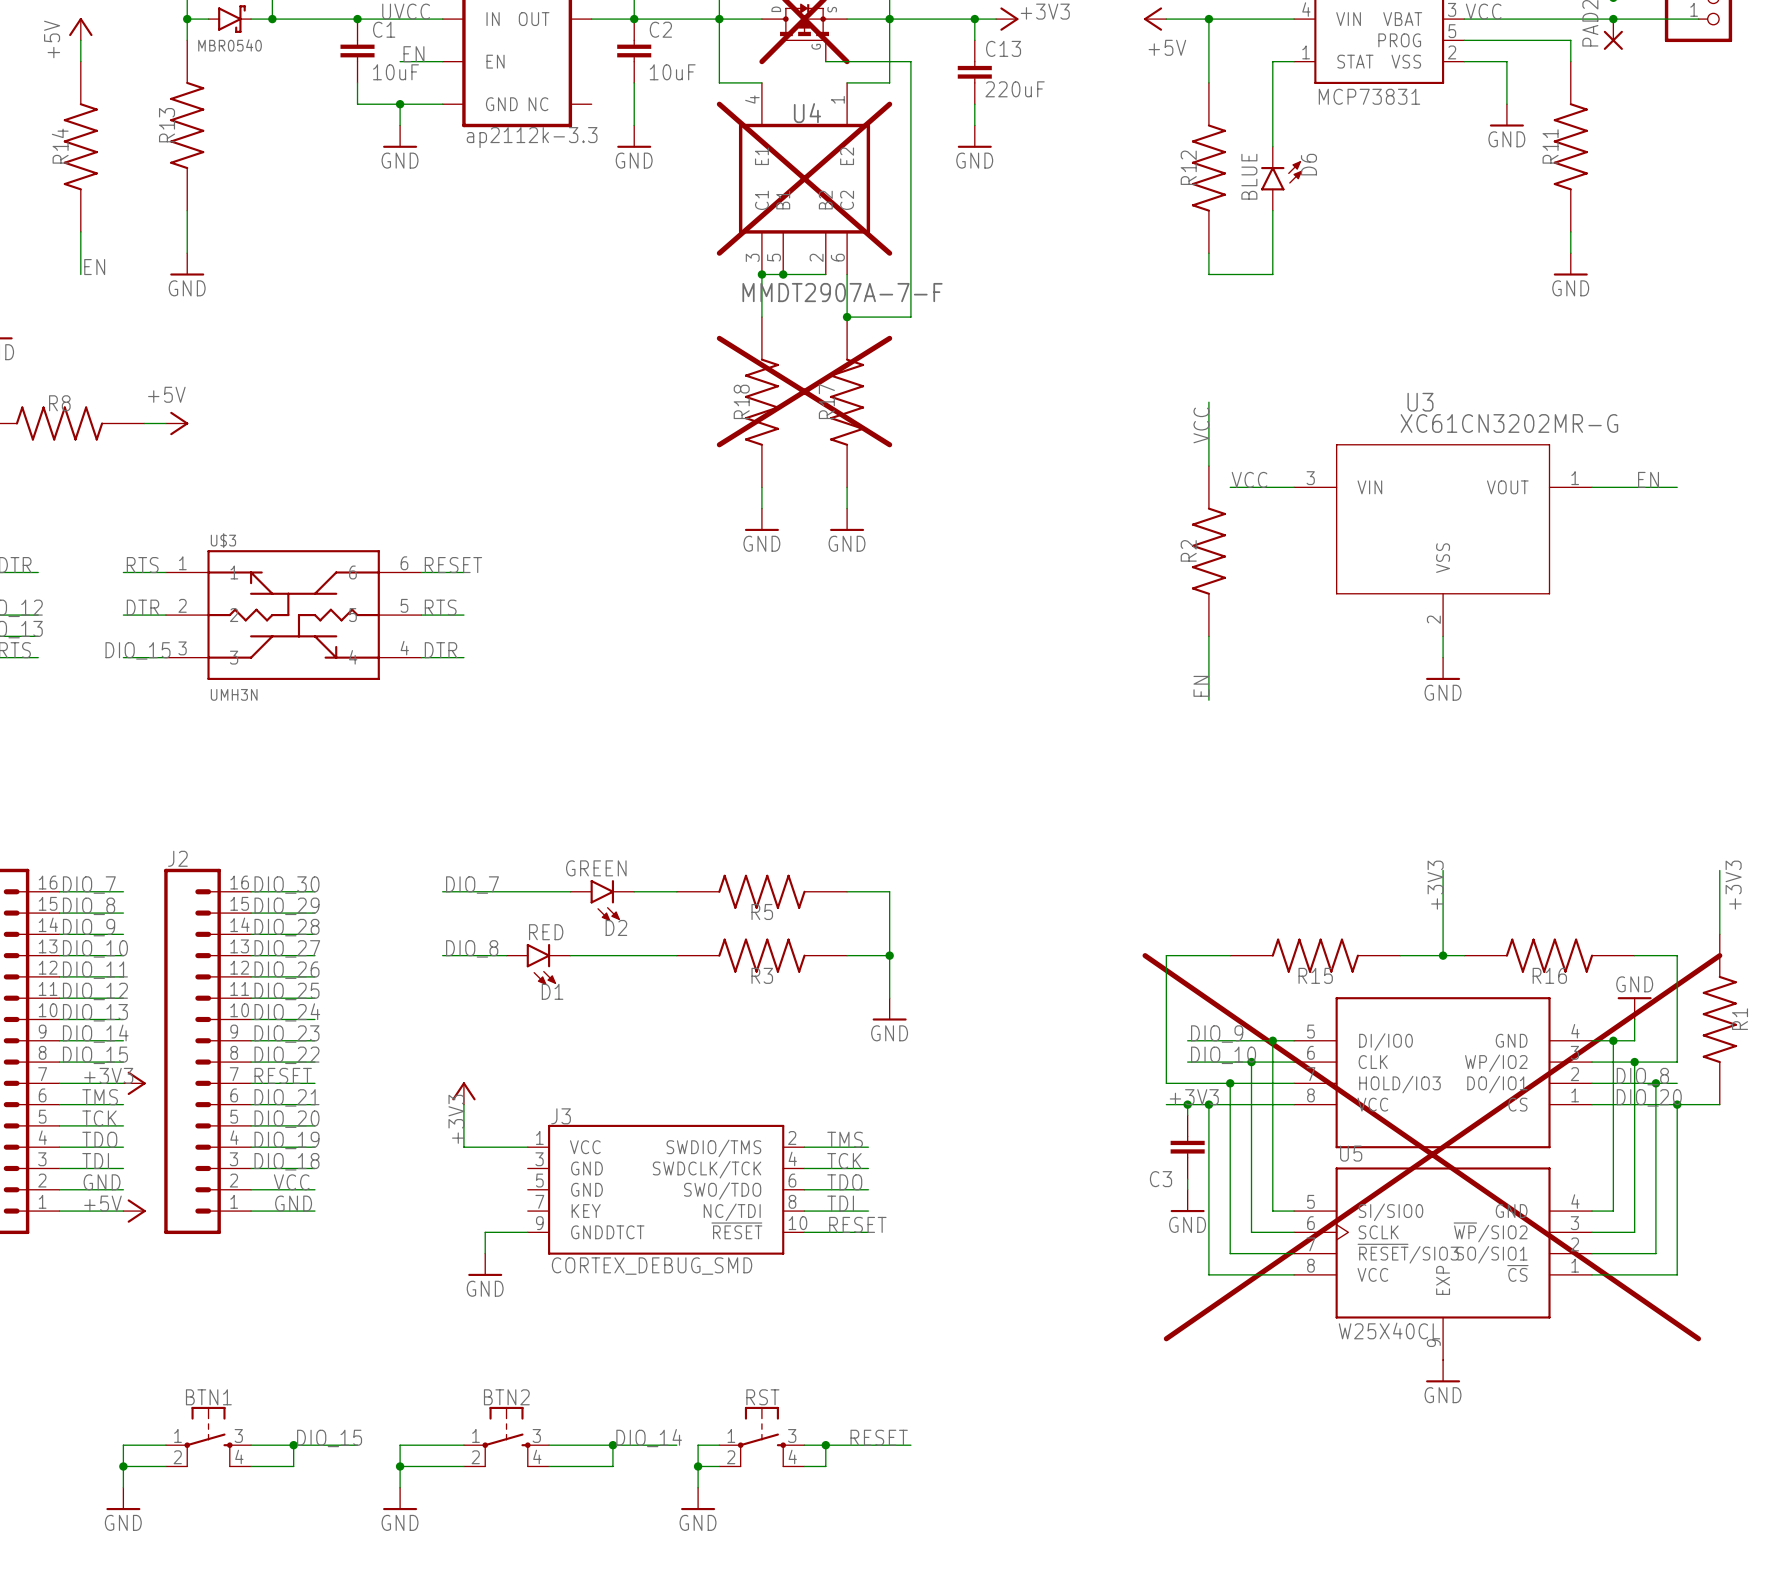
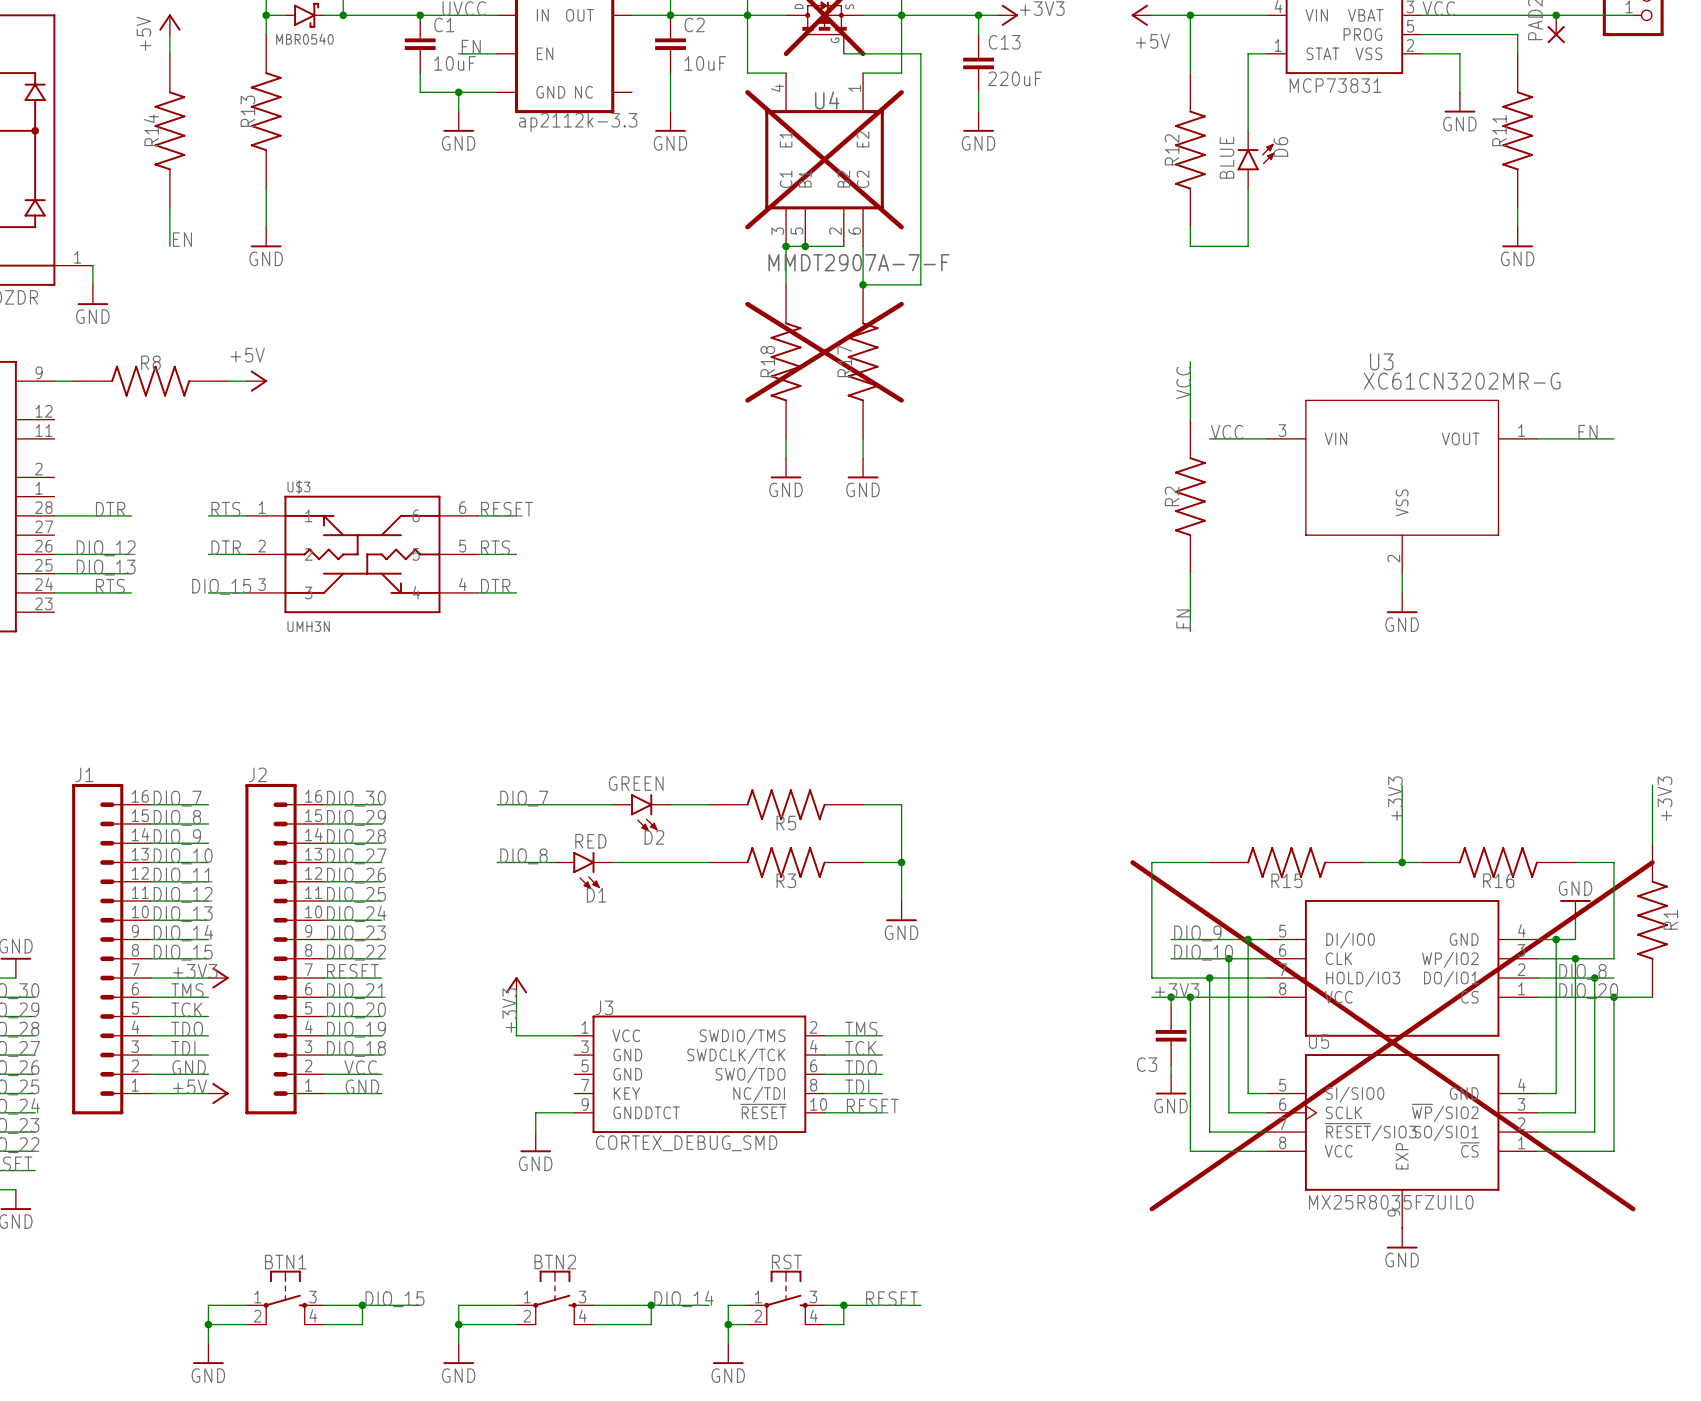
U5 value: W25X40CL (1389, 1330) -> MX25R8035FZUIL0 (1391, 1202)

